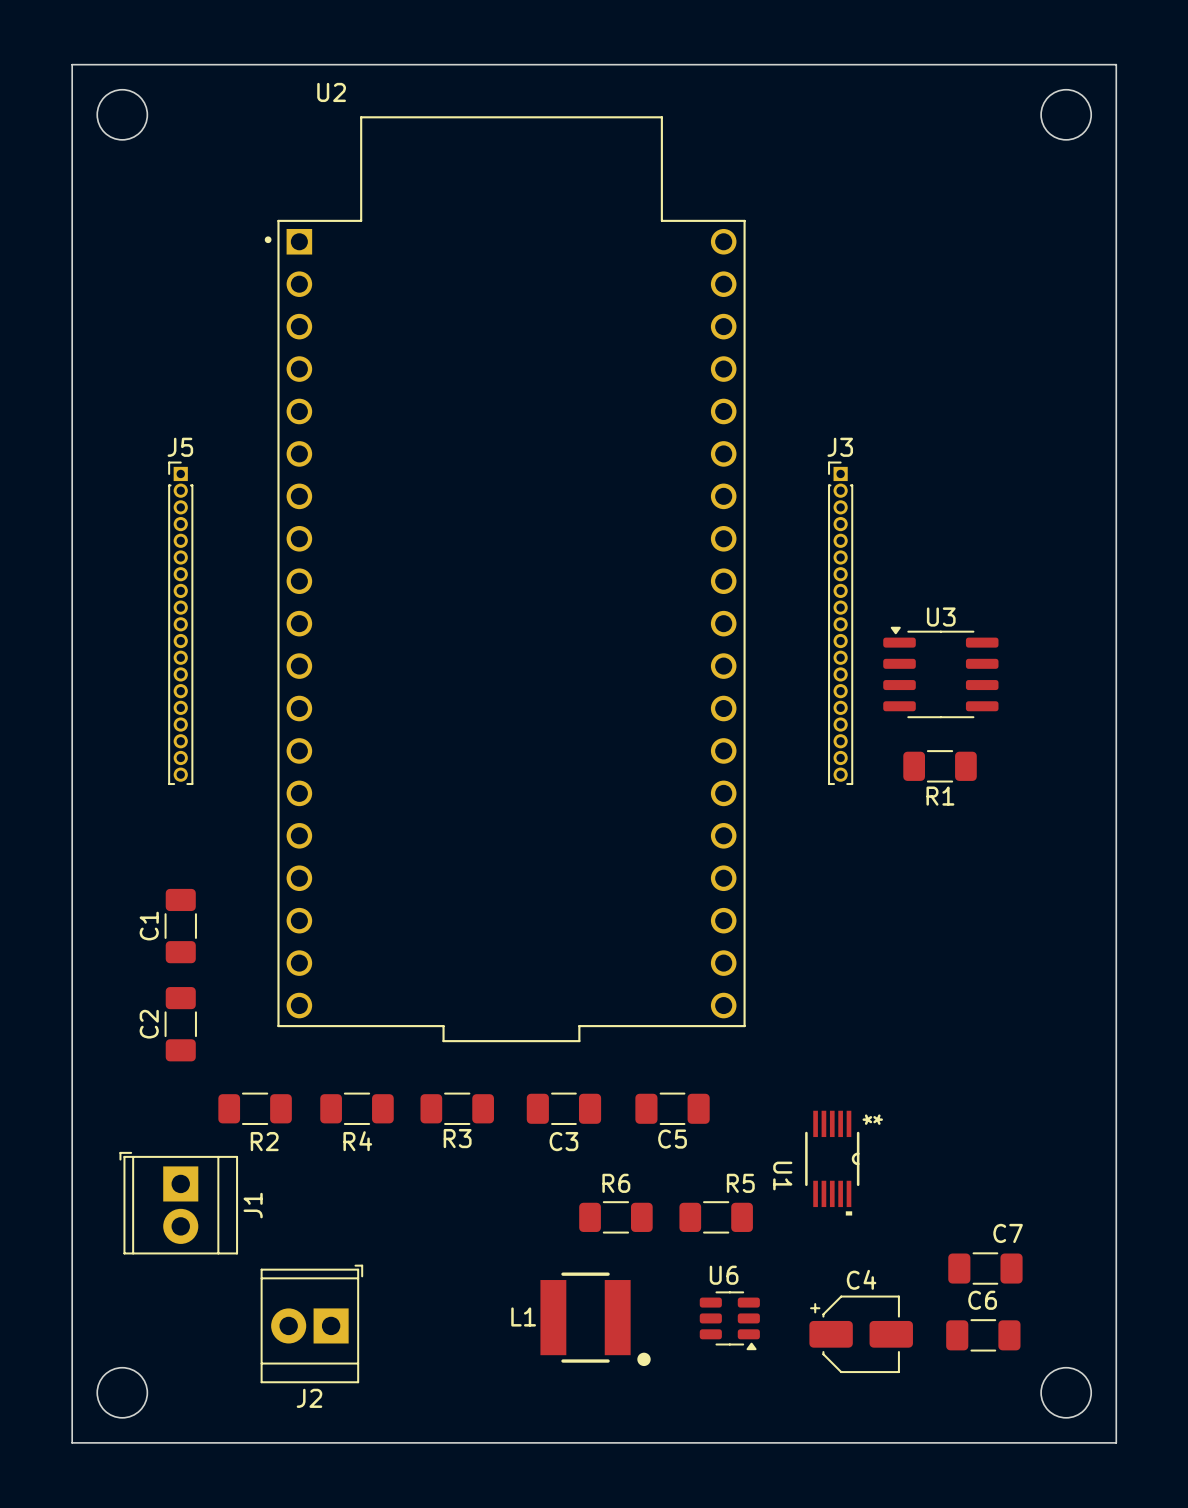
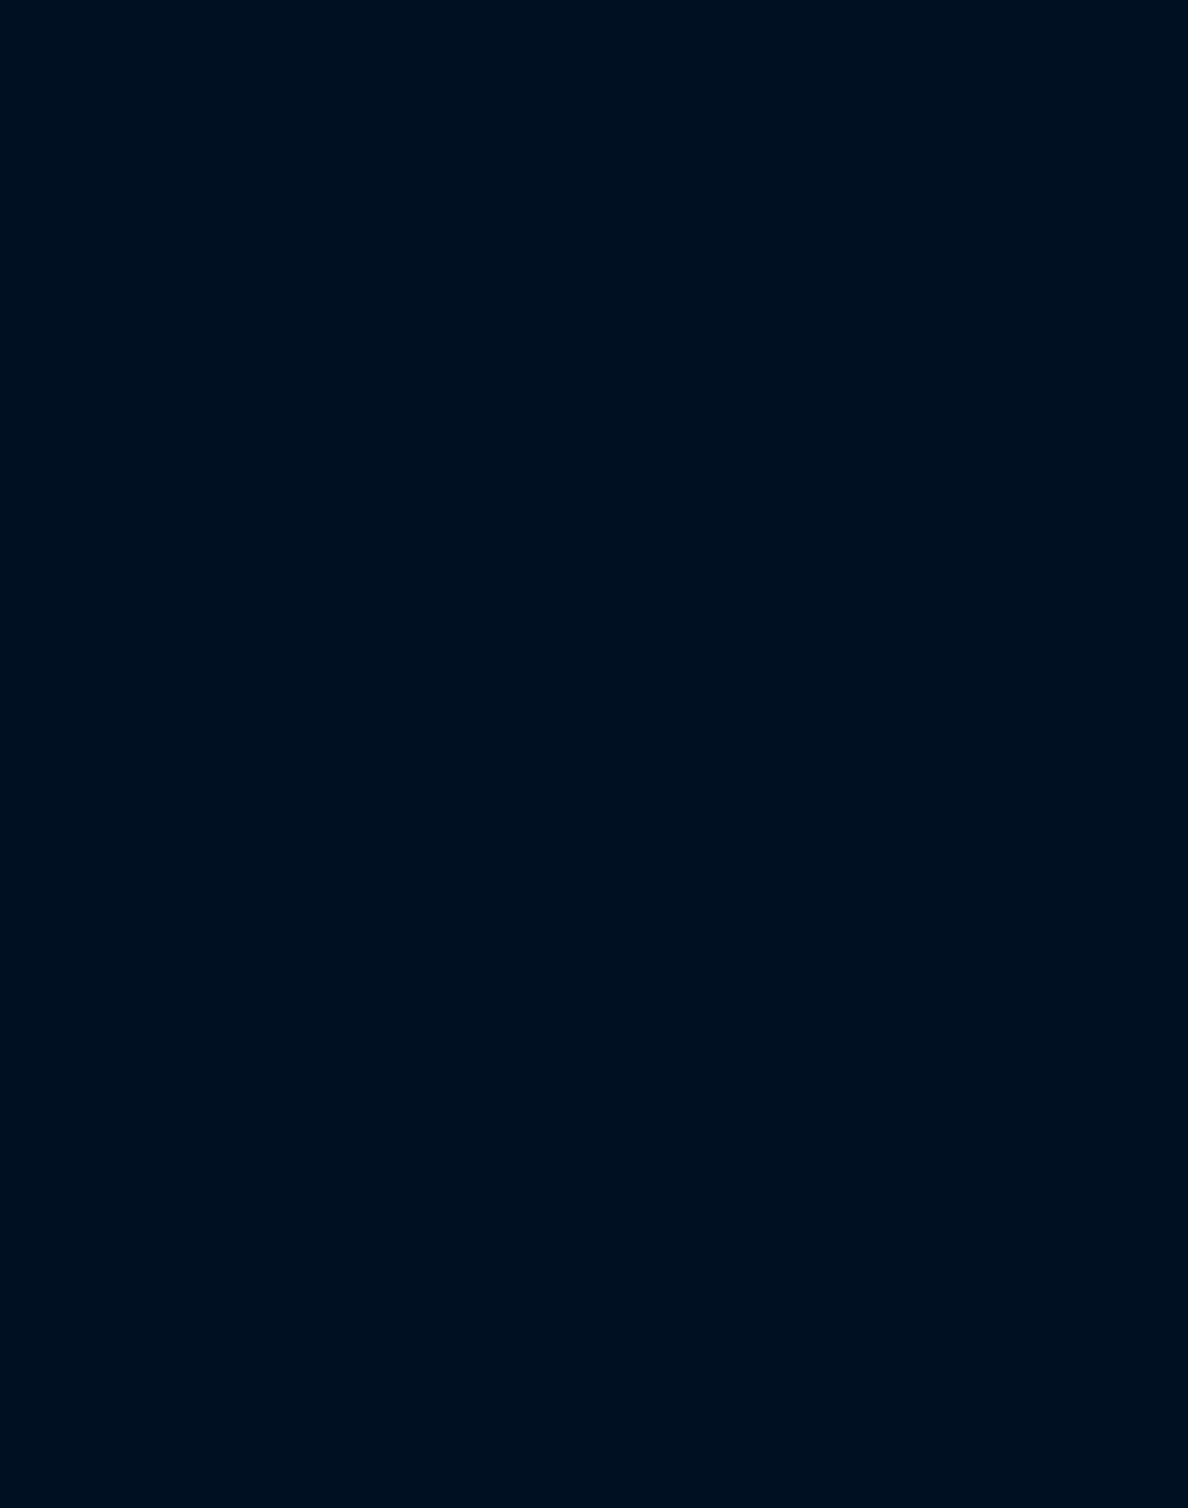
board edge: (72, 64) (1116, 64) (1116, 1442) (72, 1442) (72, 64) -> none
round board edge: [96, 88, 149, 141] -> none
round board edge: [1040, 88, 1093, 141] -> none
U2: (505, 579) -> none
J5: (180, 623) -> none
J3: (840, 623) -> none
U3: (940, 672) -> none
R1: (940, 766) -> none
C1: (180, 926) -> none
C2: (180, 1024) -> none
R2: (255, 1108) -> none
R4: (357, 1108) -> none
R3: (457, 1108) -> none
C3: (563, 1108) -> none
C5: (672, 1108) -> none
U1: (832, 1163) -> none
J1: (178, 1203) -> none
R6: (615, 1217) -> none
R5: (716, 1217) -> none
C7: (985, 1268) -> none
L1: (595, 1319) -> none
U6: (729, 1320) -> none
J2: (311, 1323) -> none
C4: (861, 1334) -> none
C6: (983, 1335) -> none
round board edge: [96, 1366, 149, 1419] -> none
round board edge: [1040, 1366, 1093, 1419] -> none

